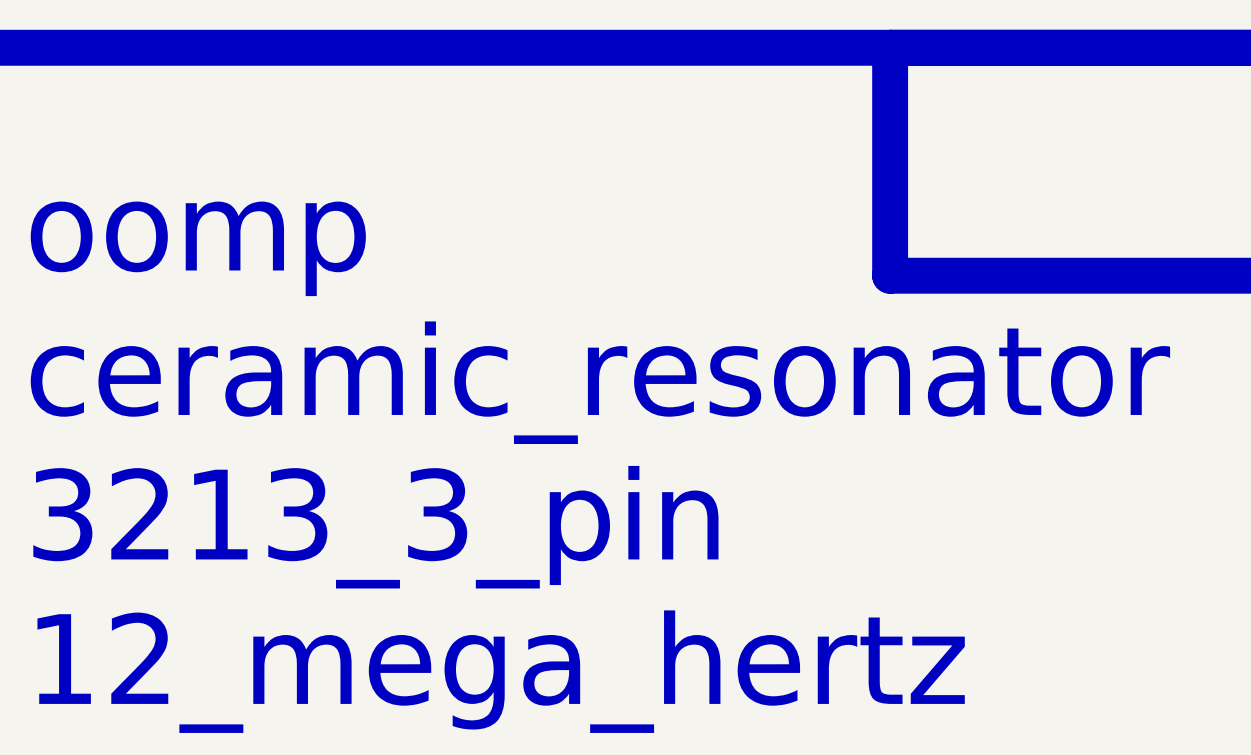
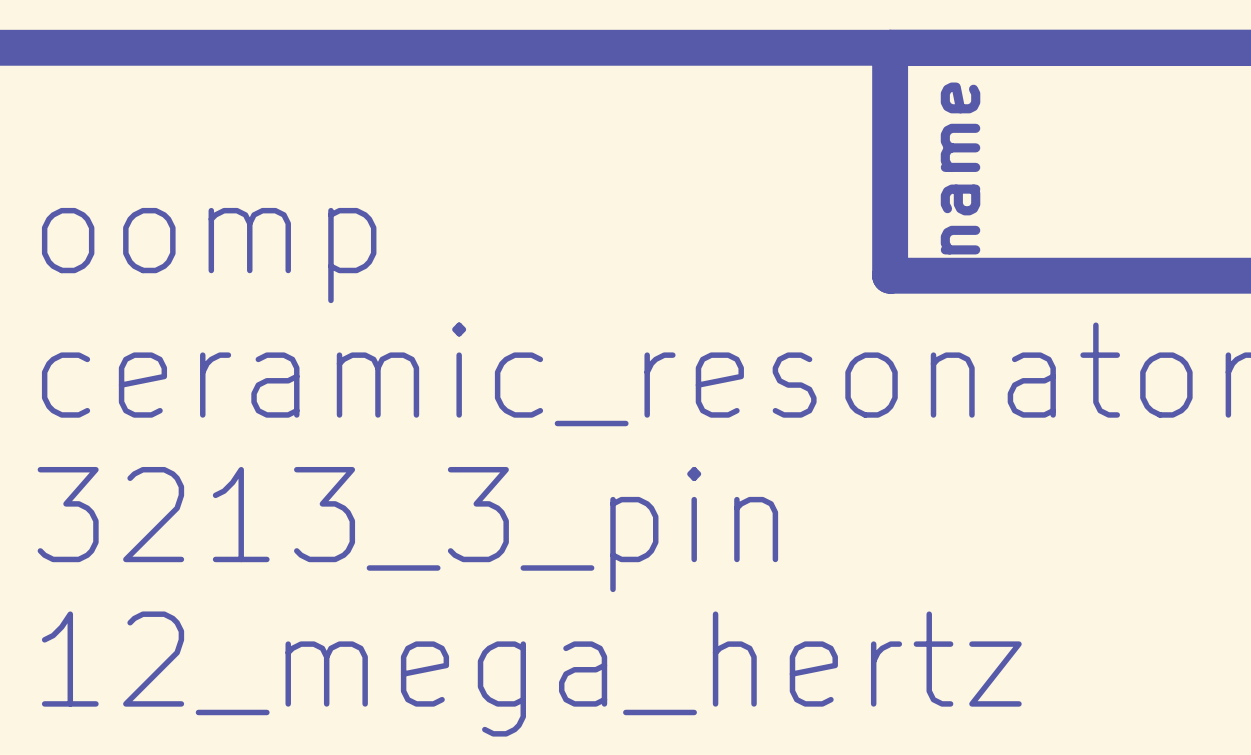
text: none -> name (960, 168)

